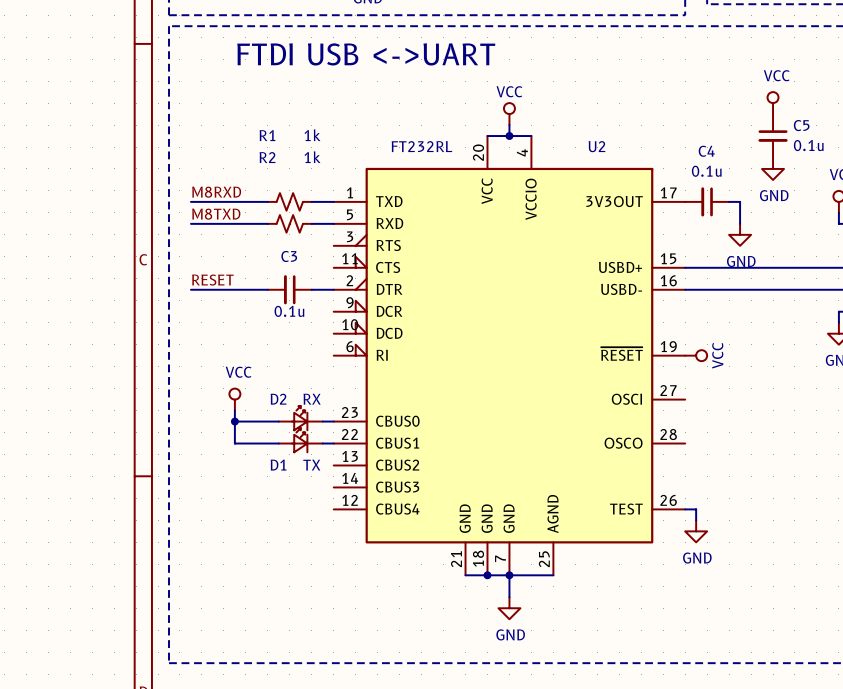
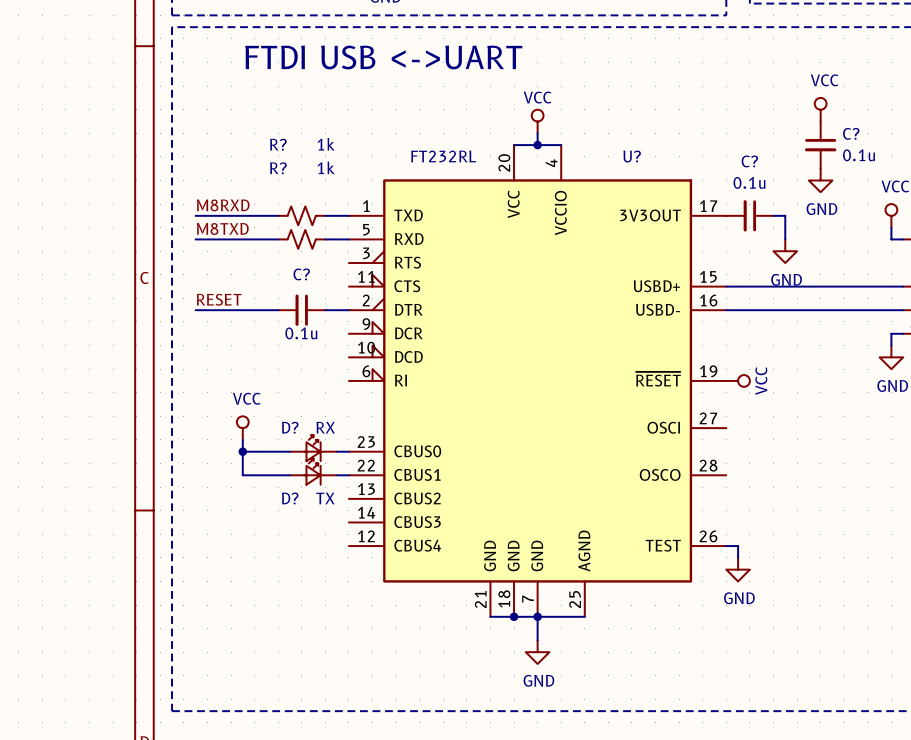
C5 name: C5 (801, 125) -> C? (851, 133)
R1 name: R1 (267, 135) -> R? (278, 144)
U2 name: U2 (596, 146) -> U? (632, 156)
C4 name: C4 (706, 151) -> C? (749, 161)
R2 name: R2 (267, 157) -> R? (278, 168)
C3 name: C3 (289, 256) -> C? (301, 274)
D2 name: D2 (278, 399) -> D? (290, 427)
D1 name: D1 (278, 465) -> D? (290, 498)

